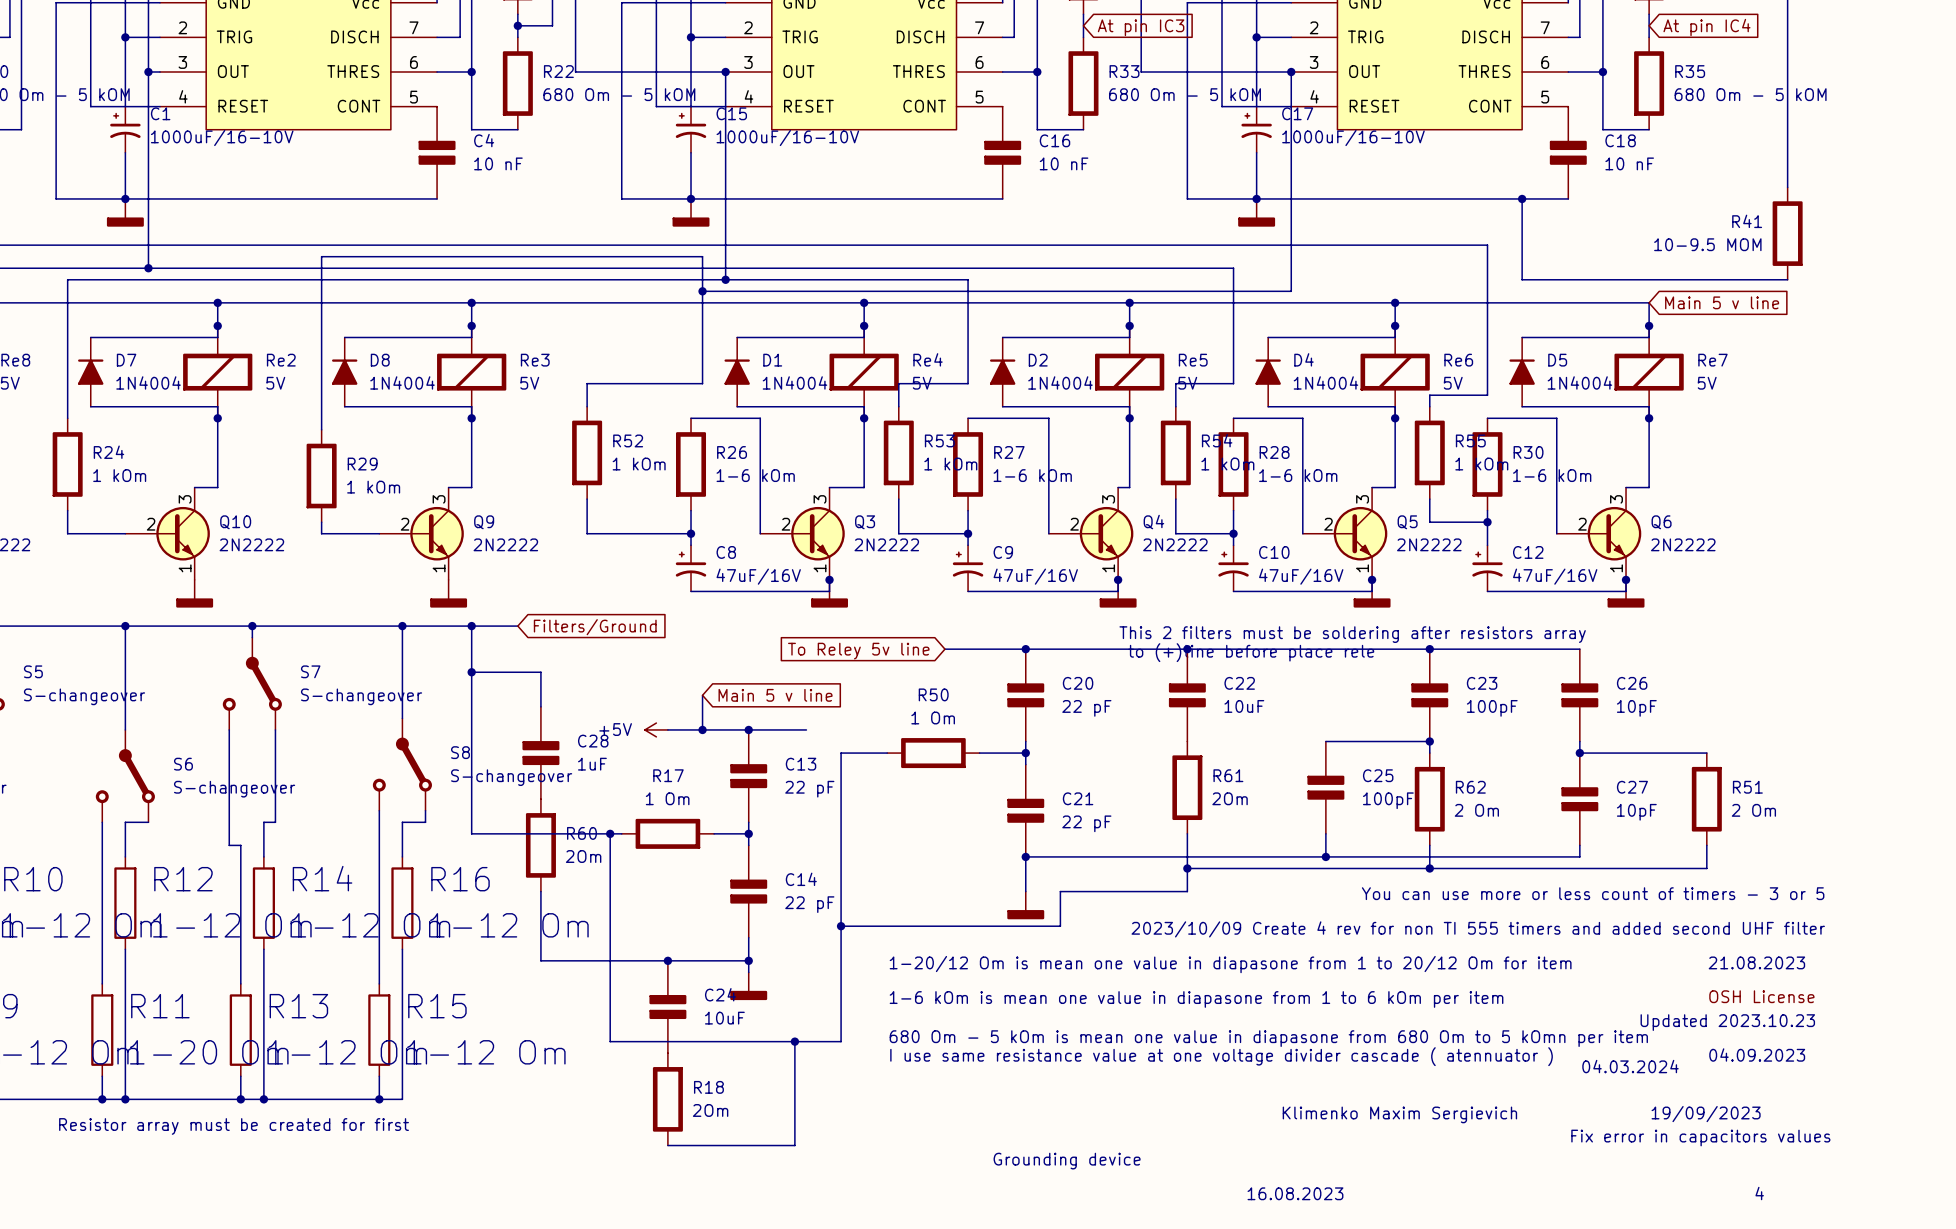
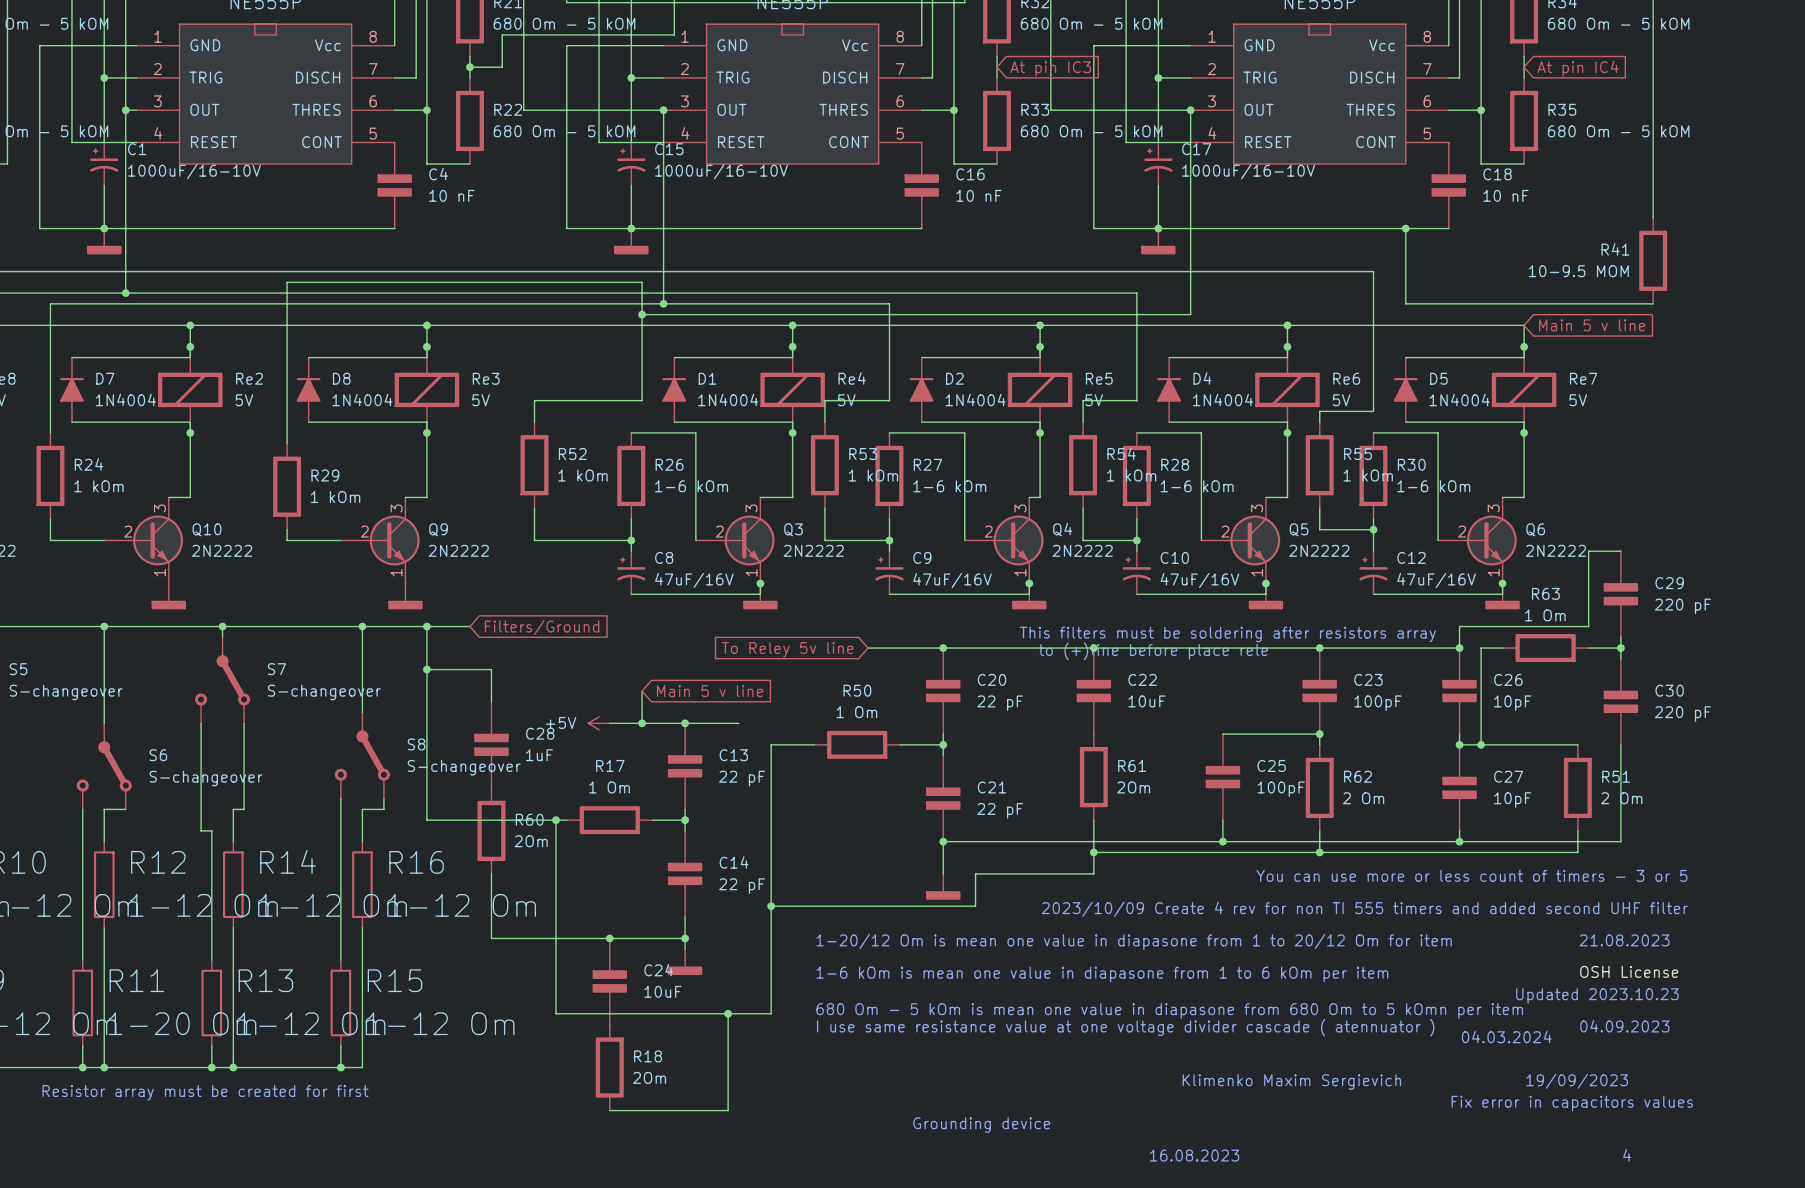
wire: none -> (1620, 551) (1588, 551) (1588, 626) (1459, 626) (1459, 648)
C29: none -> 220 pF (1620, 594)
text: This 2 filters must be soldering after resistors array (1352, 634) -> This filters must be soldering after resistors array (1227, 634)
wire: none -> (1620, 637) (1620, 658)
junction: none -> (1459, 648)
wire: none -> (1502, 648) (1481, 648) (1481, 744)
R63: none -> 1 Om (1545, 648)
wire: none -> (1588, 648) (1620, 648)
junction: none -> (1620, 648)
C30: none -> 220 pF (1620, 701)
junction: none -> (1481, 744)
wire: none -> (1620, 744) (1620, 841) (1459, 841)
junction: none -> (1459, 841)

